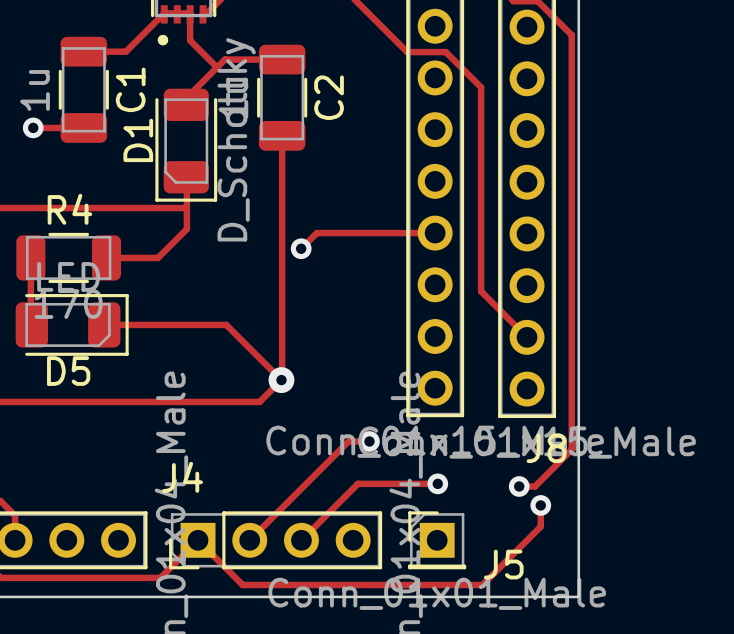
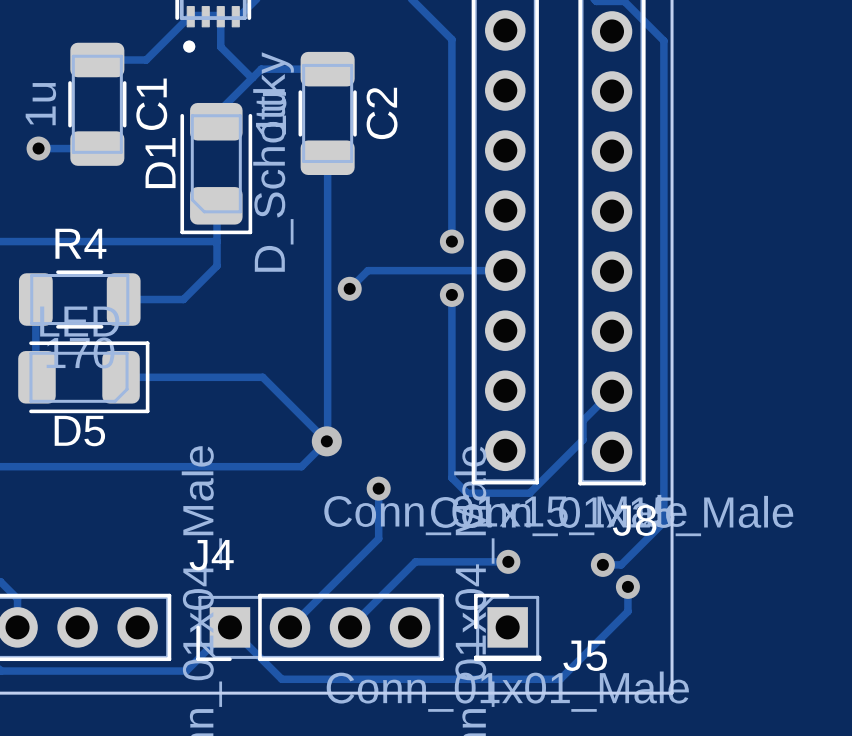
track: (389, 34) (407, 52) (445, 52) (481, 87) (481, 291) (527, 337) -> (451, 39) (451, 241)
via: none -> (451, 241)
track: none -> (451, 294) (451, 477) (467, 493) (529, 493) (582, 439) (582, 420) (611, 391)
via: none -> (451, 294)
track: (369, 441) (348, 441) (326, 463) -> (378, 488) (378, 538)
via position: (369, 441) -> (378, 488)

